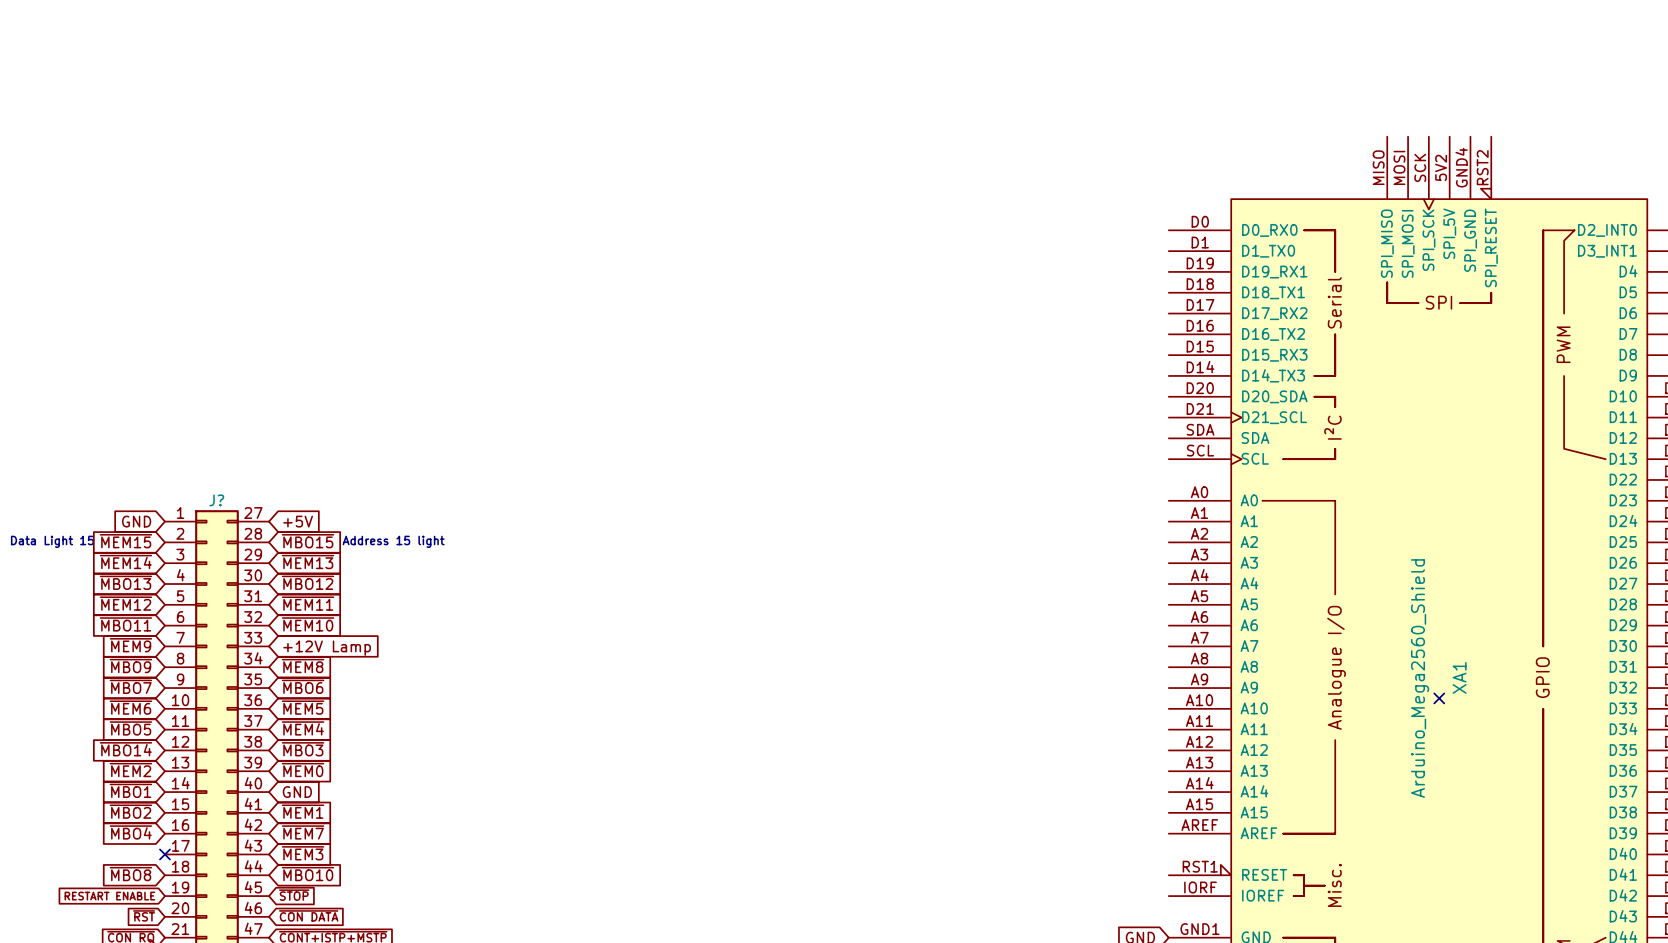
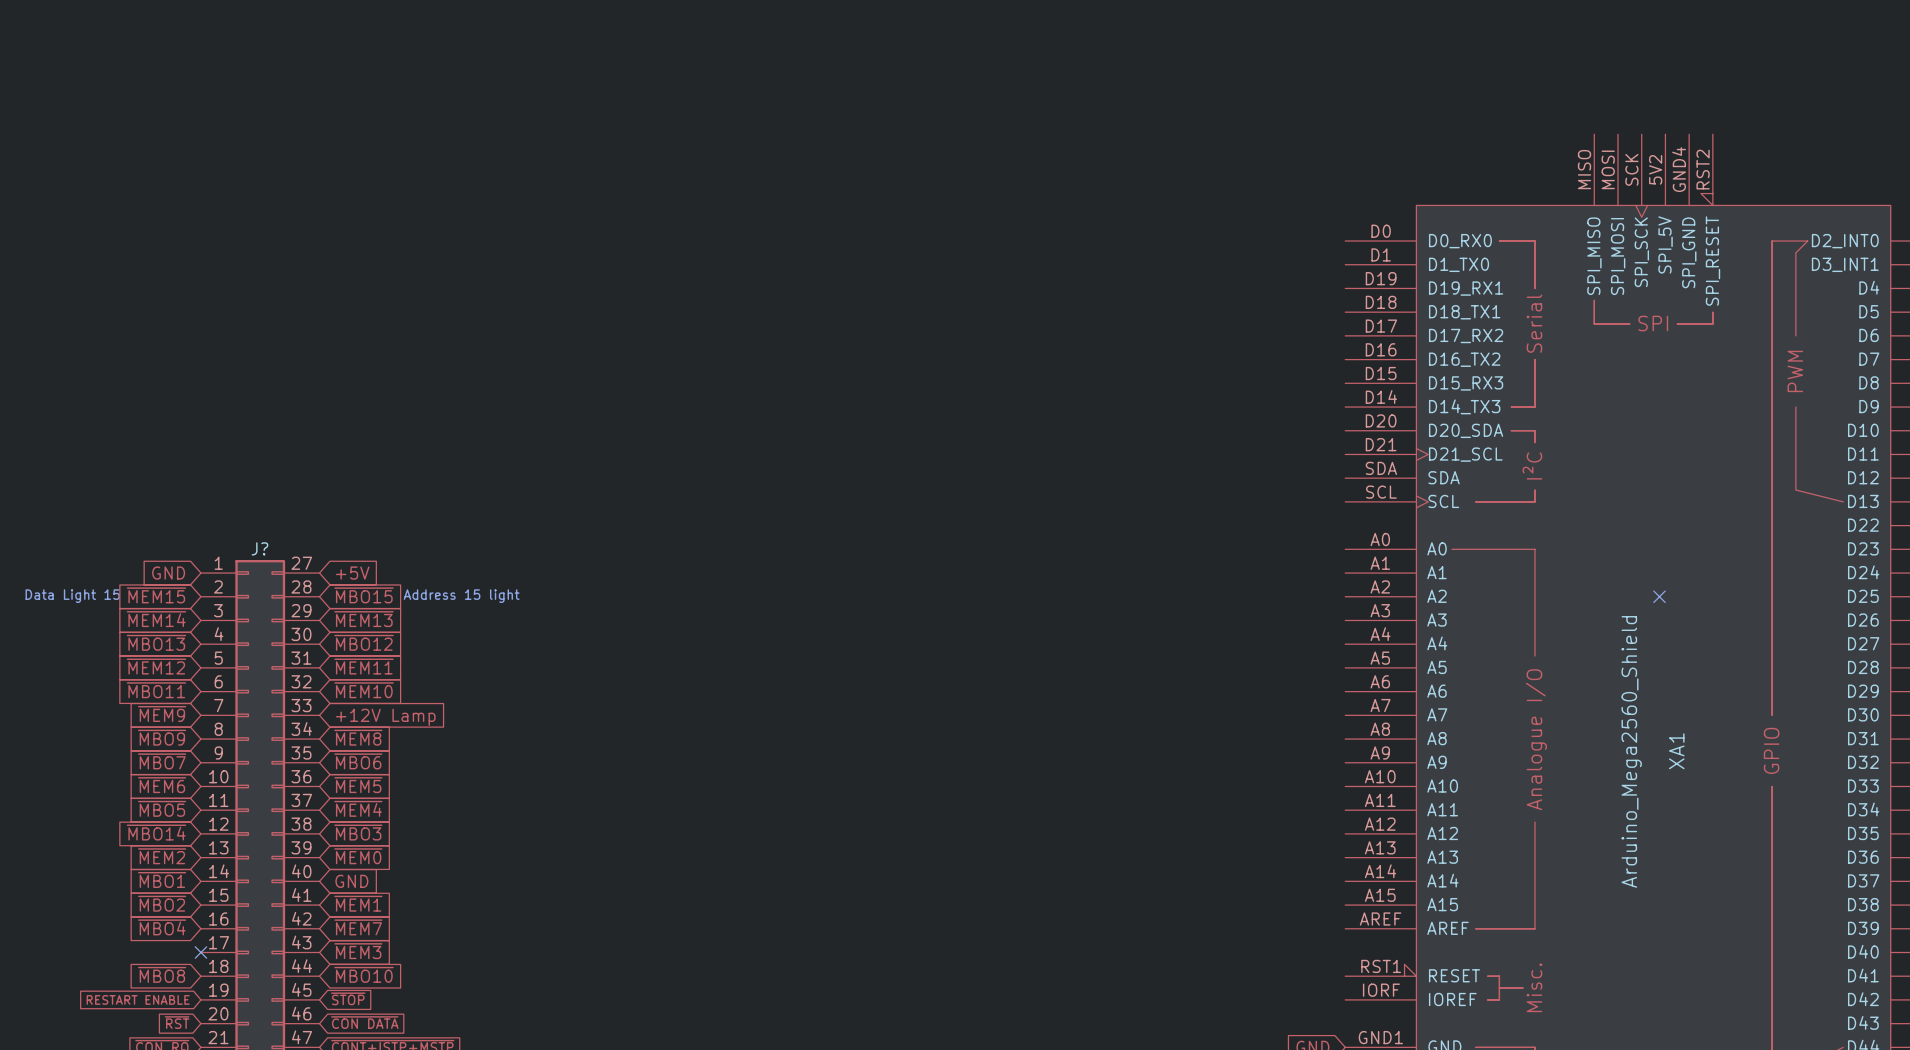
no-connect mark: none -> (1659, 596)
no-connect mark: (1439, 698) -> none

